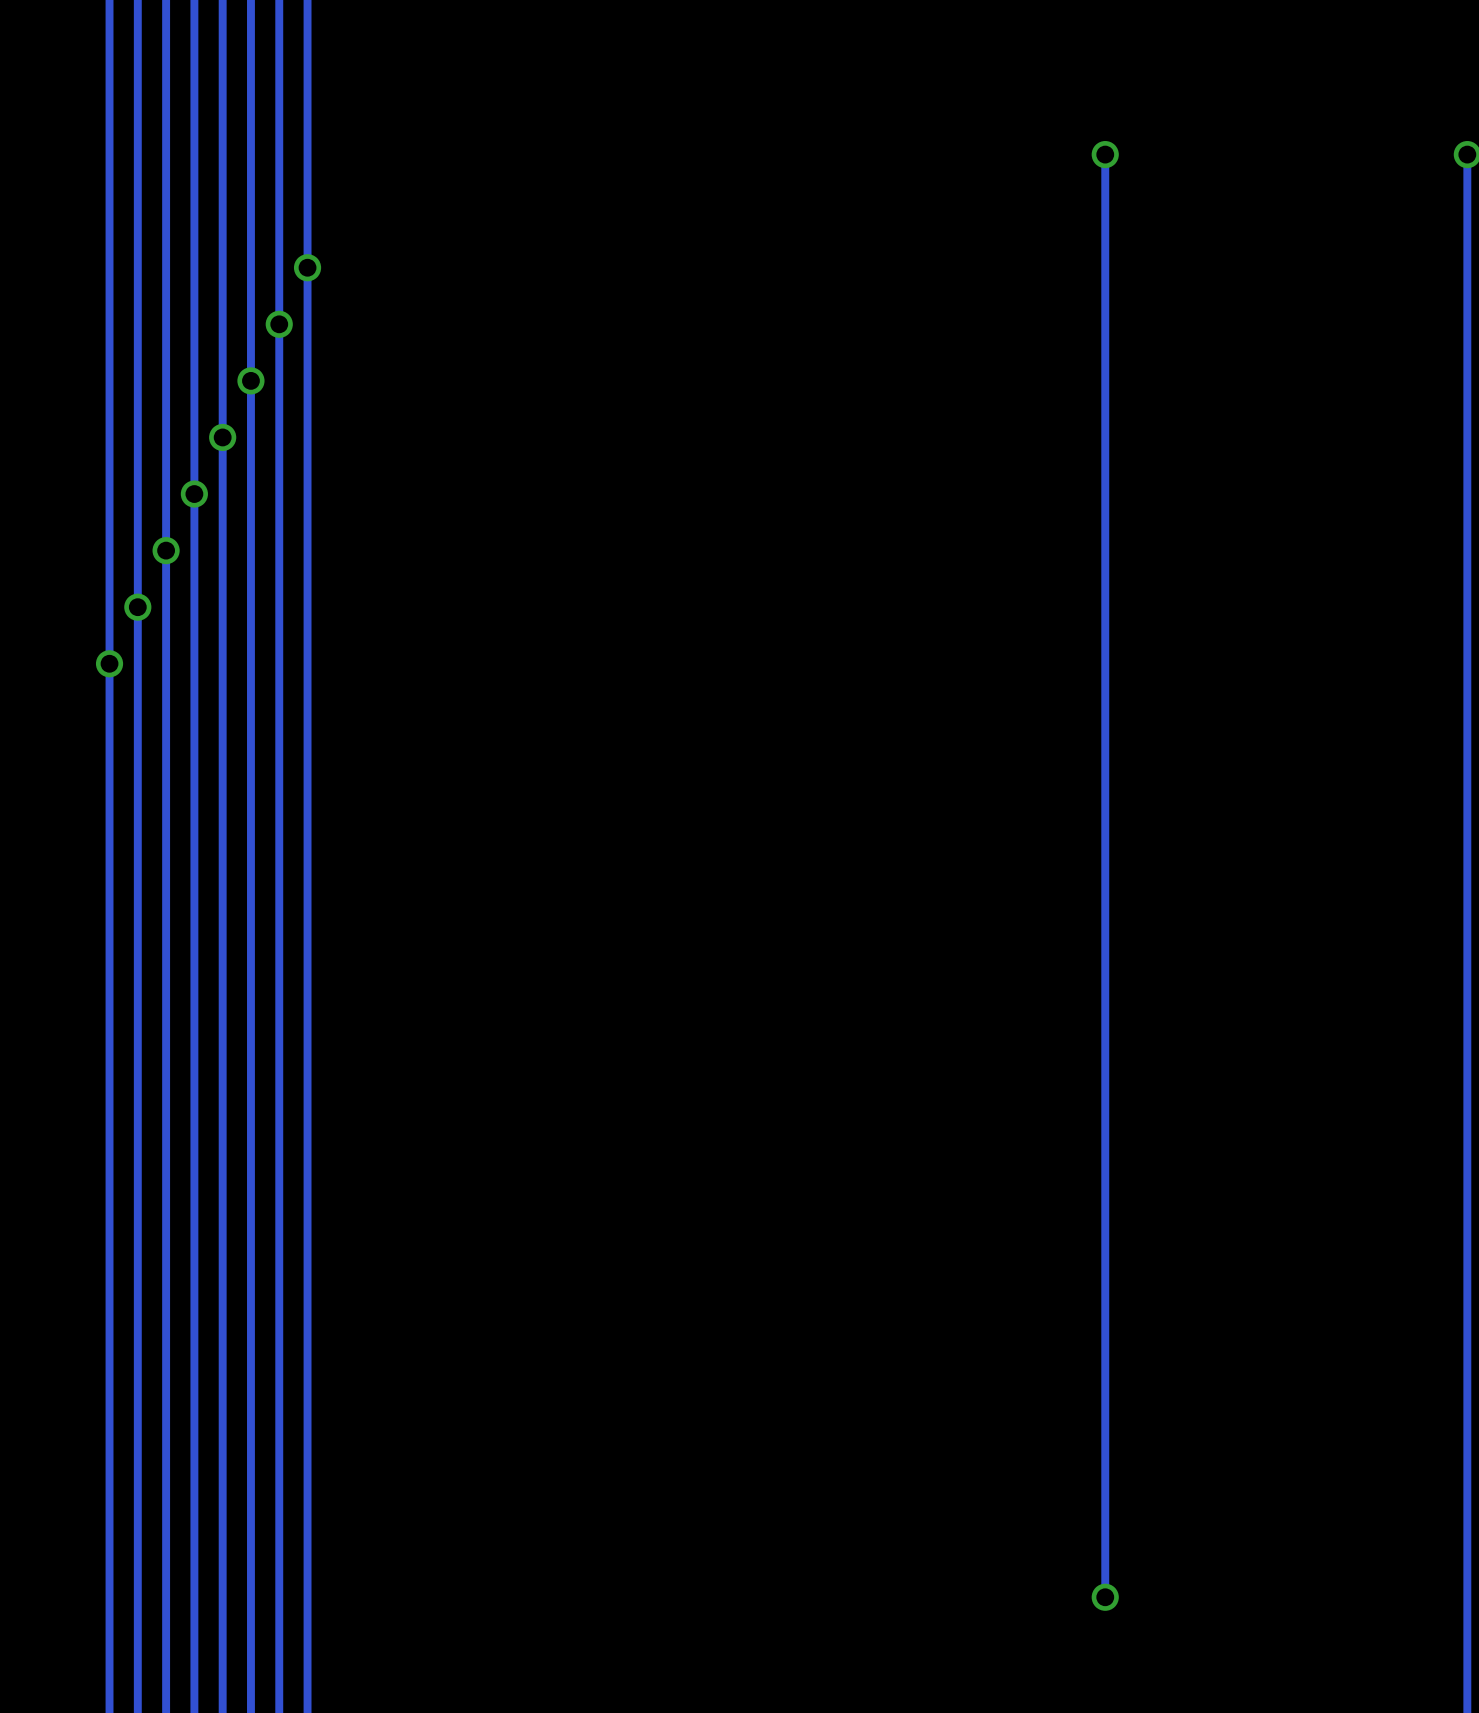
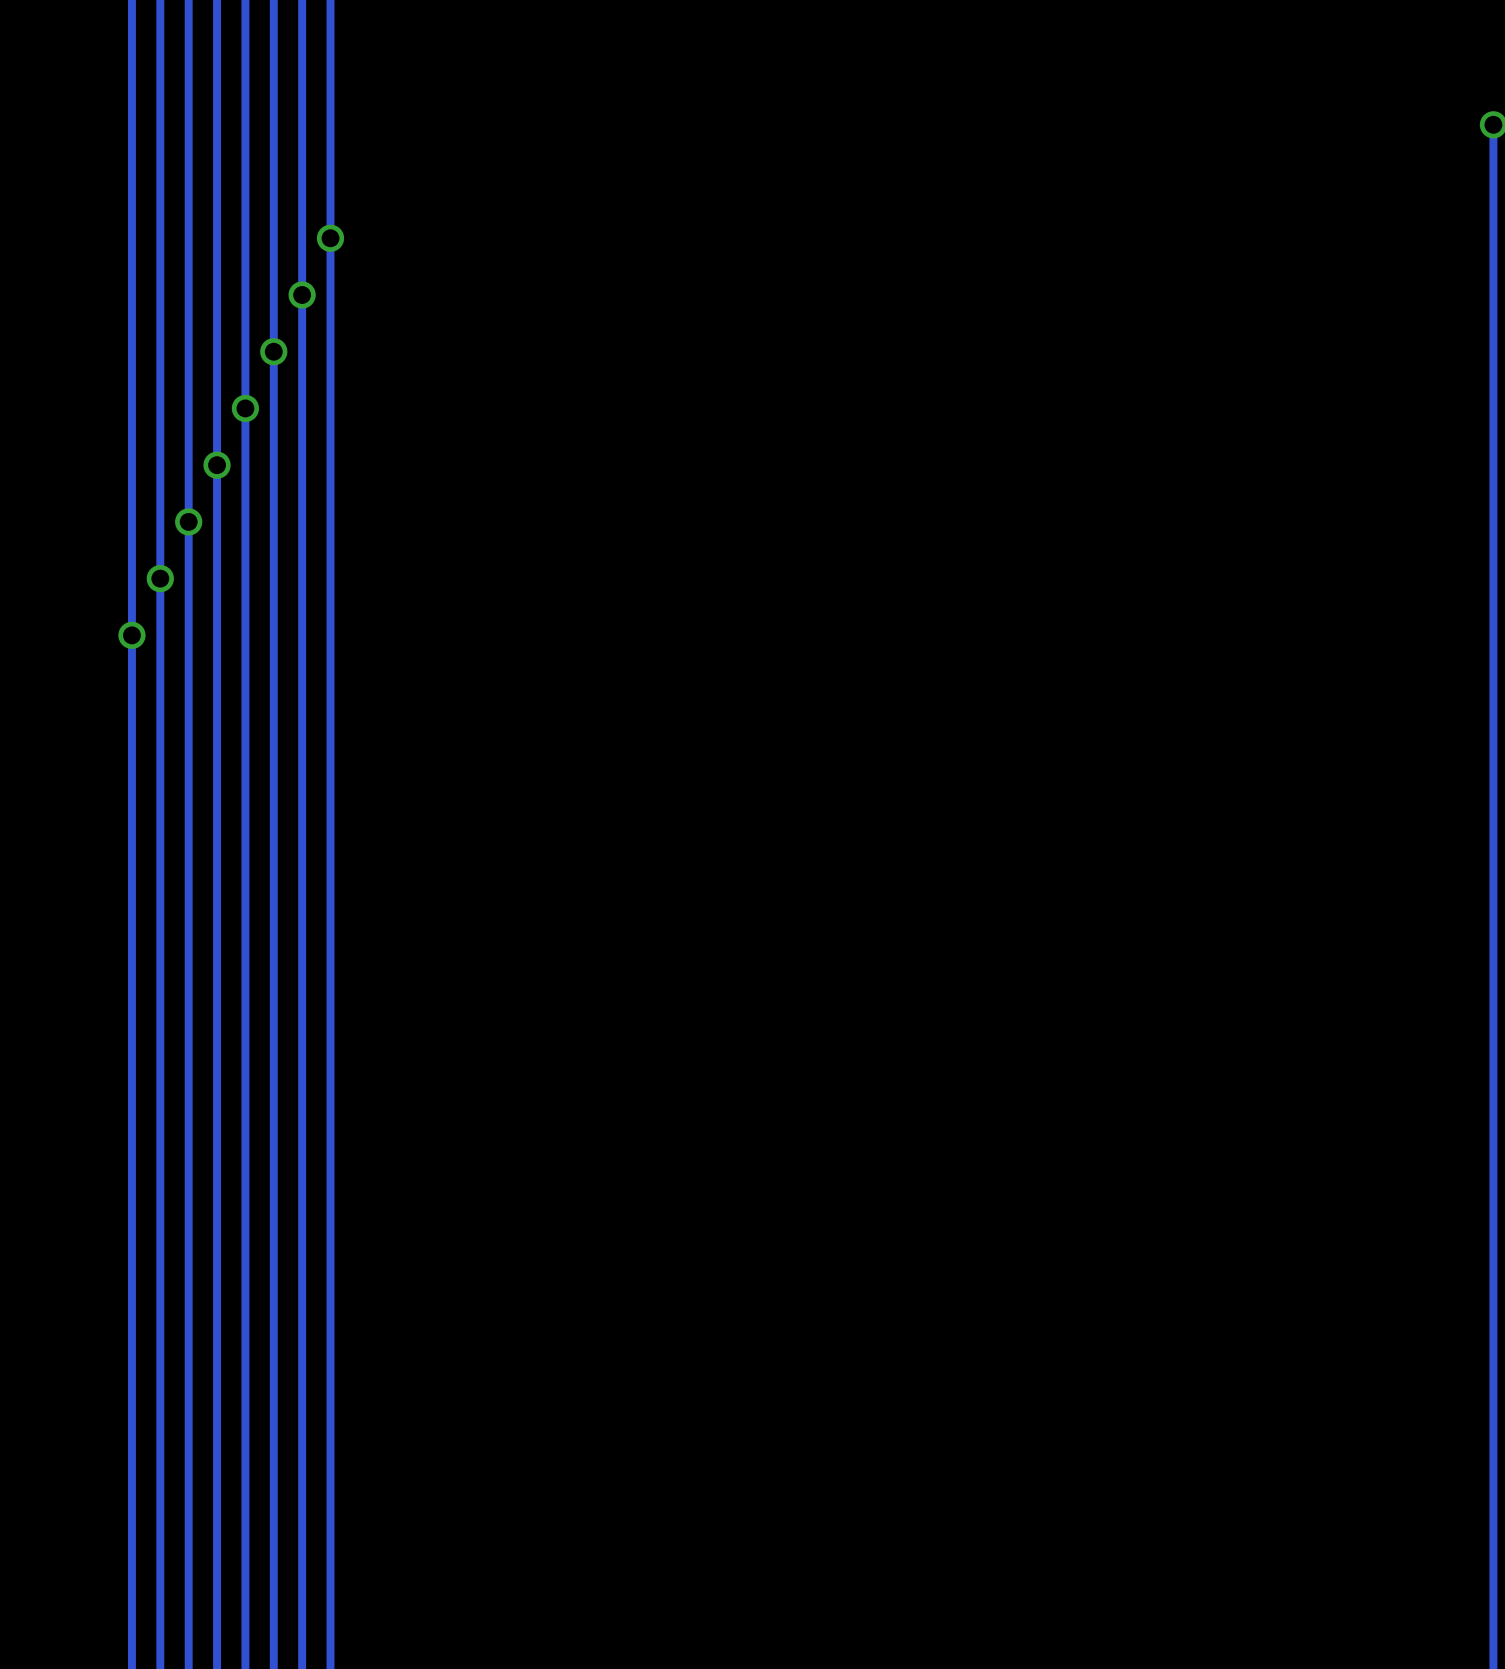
track: (1105, 154) (1105, 1597) -> none
via: (1105, 154) -> none
via: (1105, 1597) -> none

